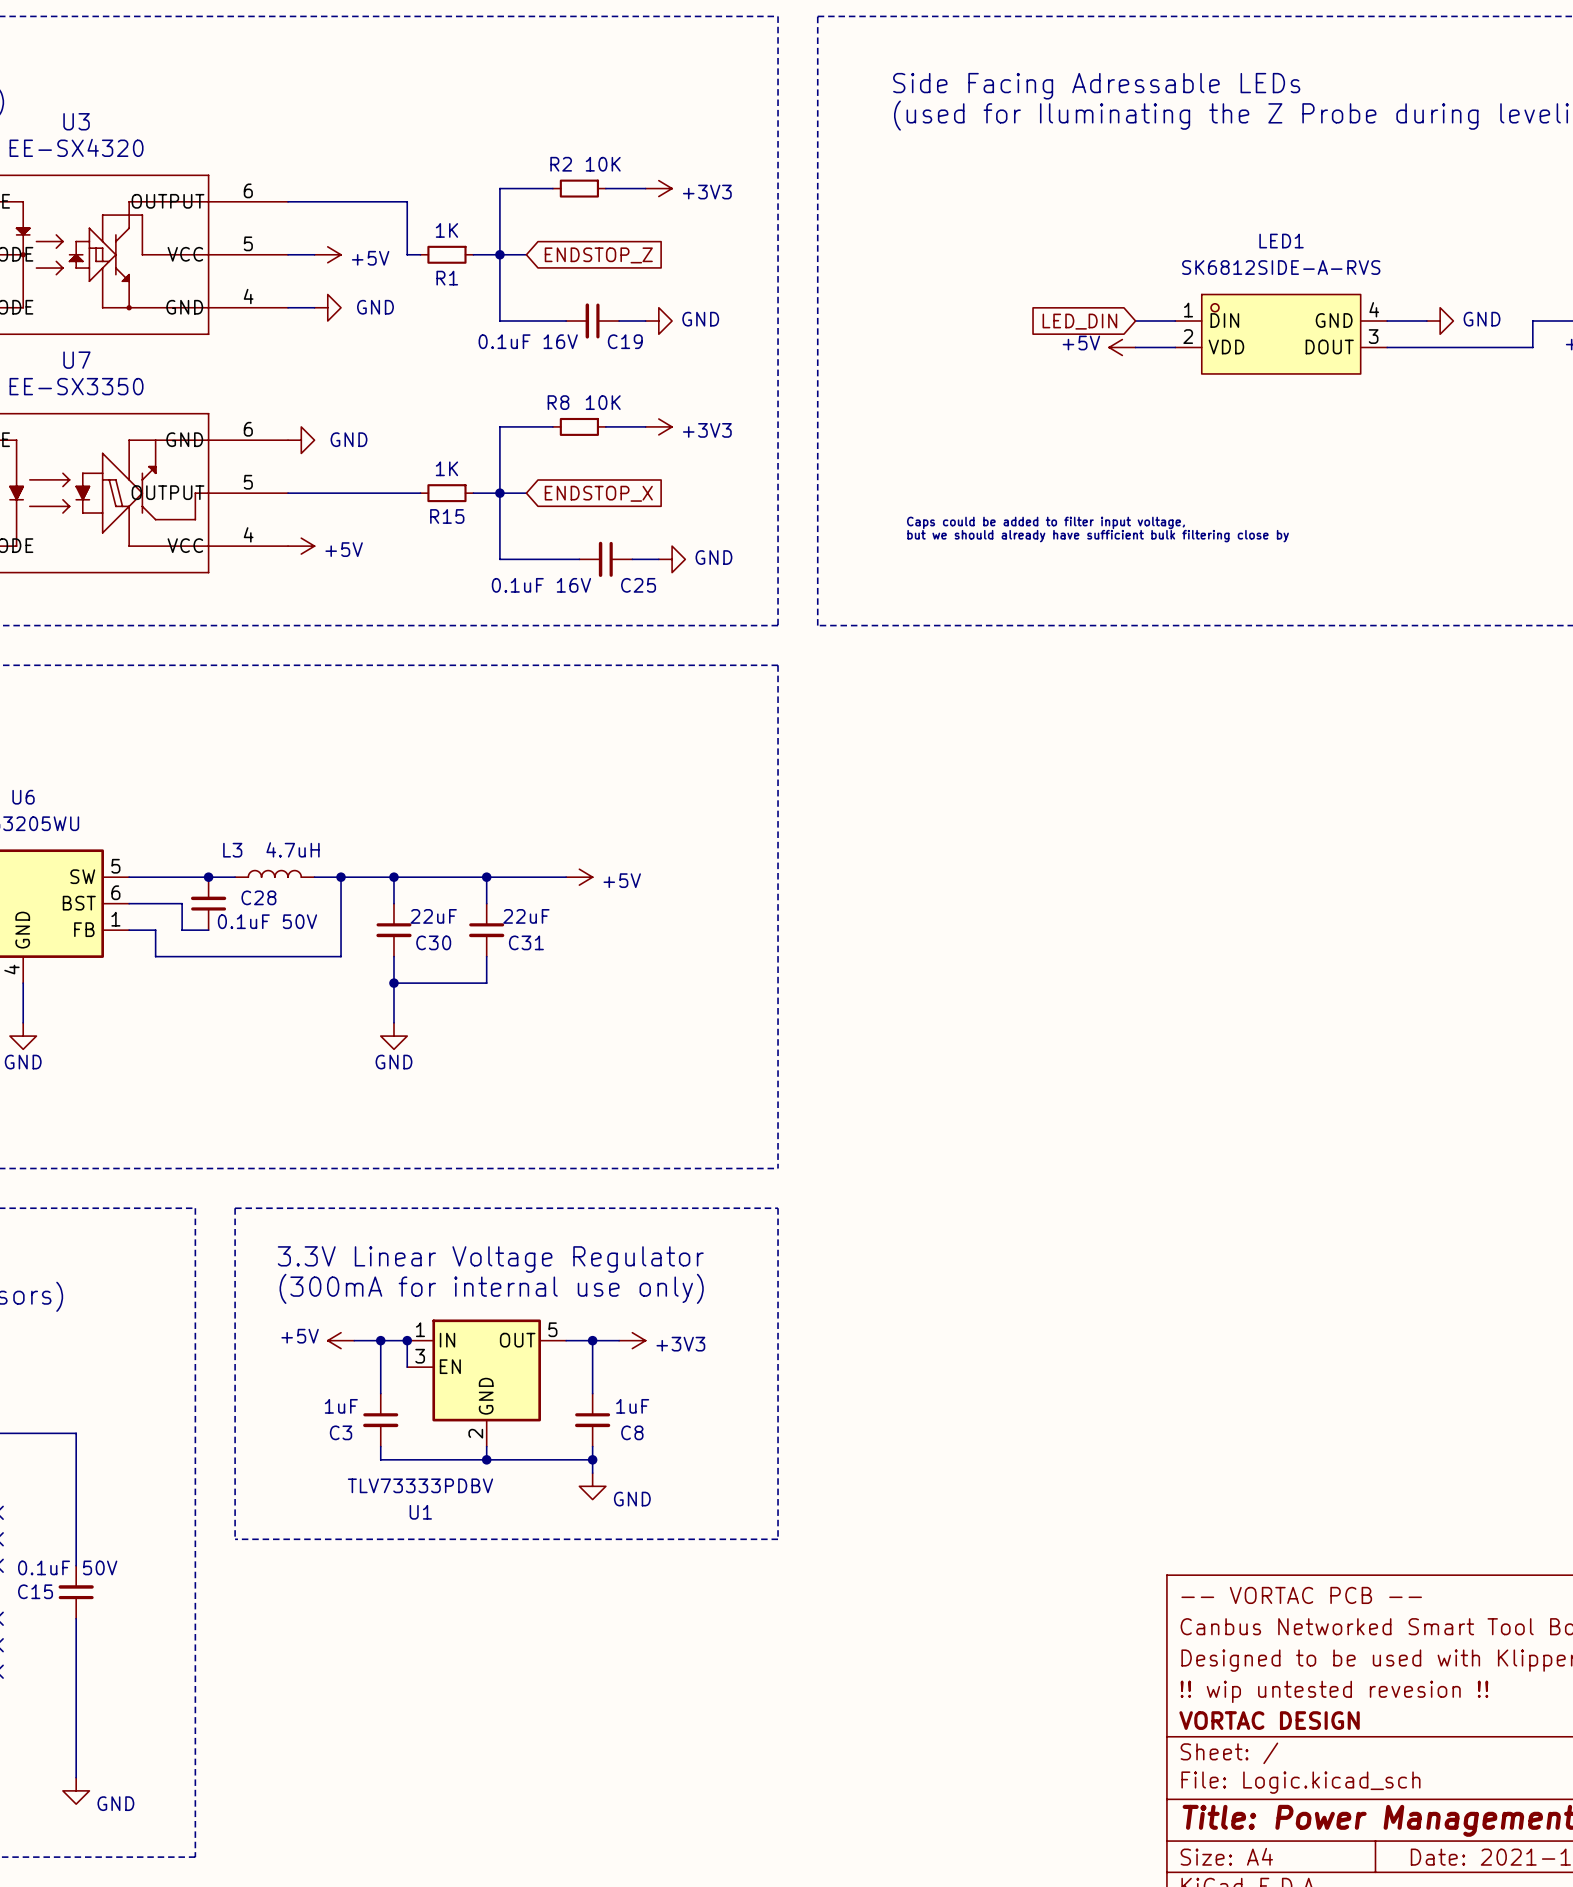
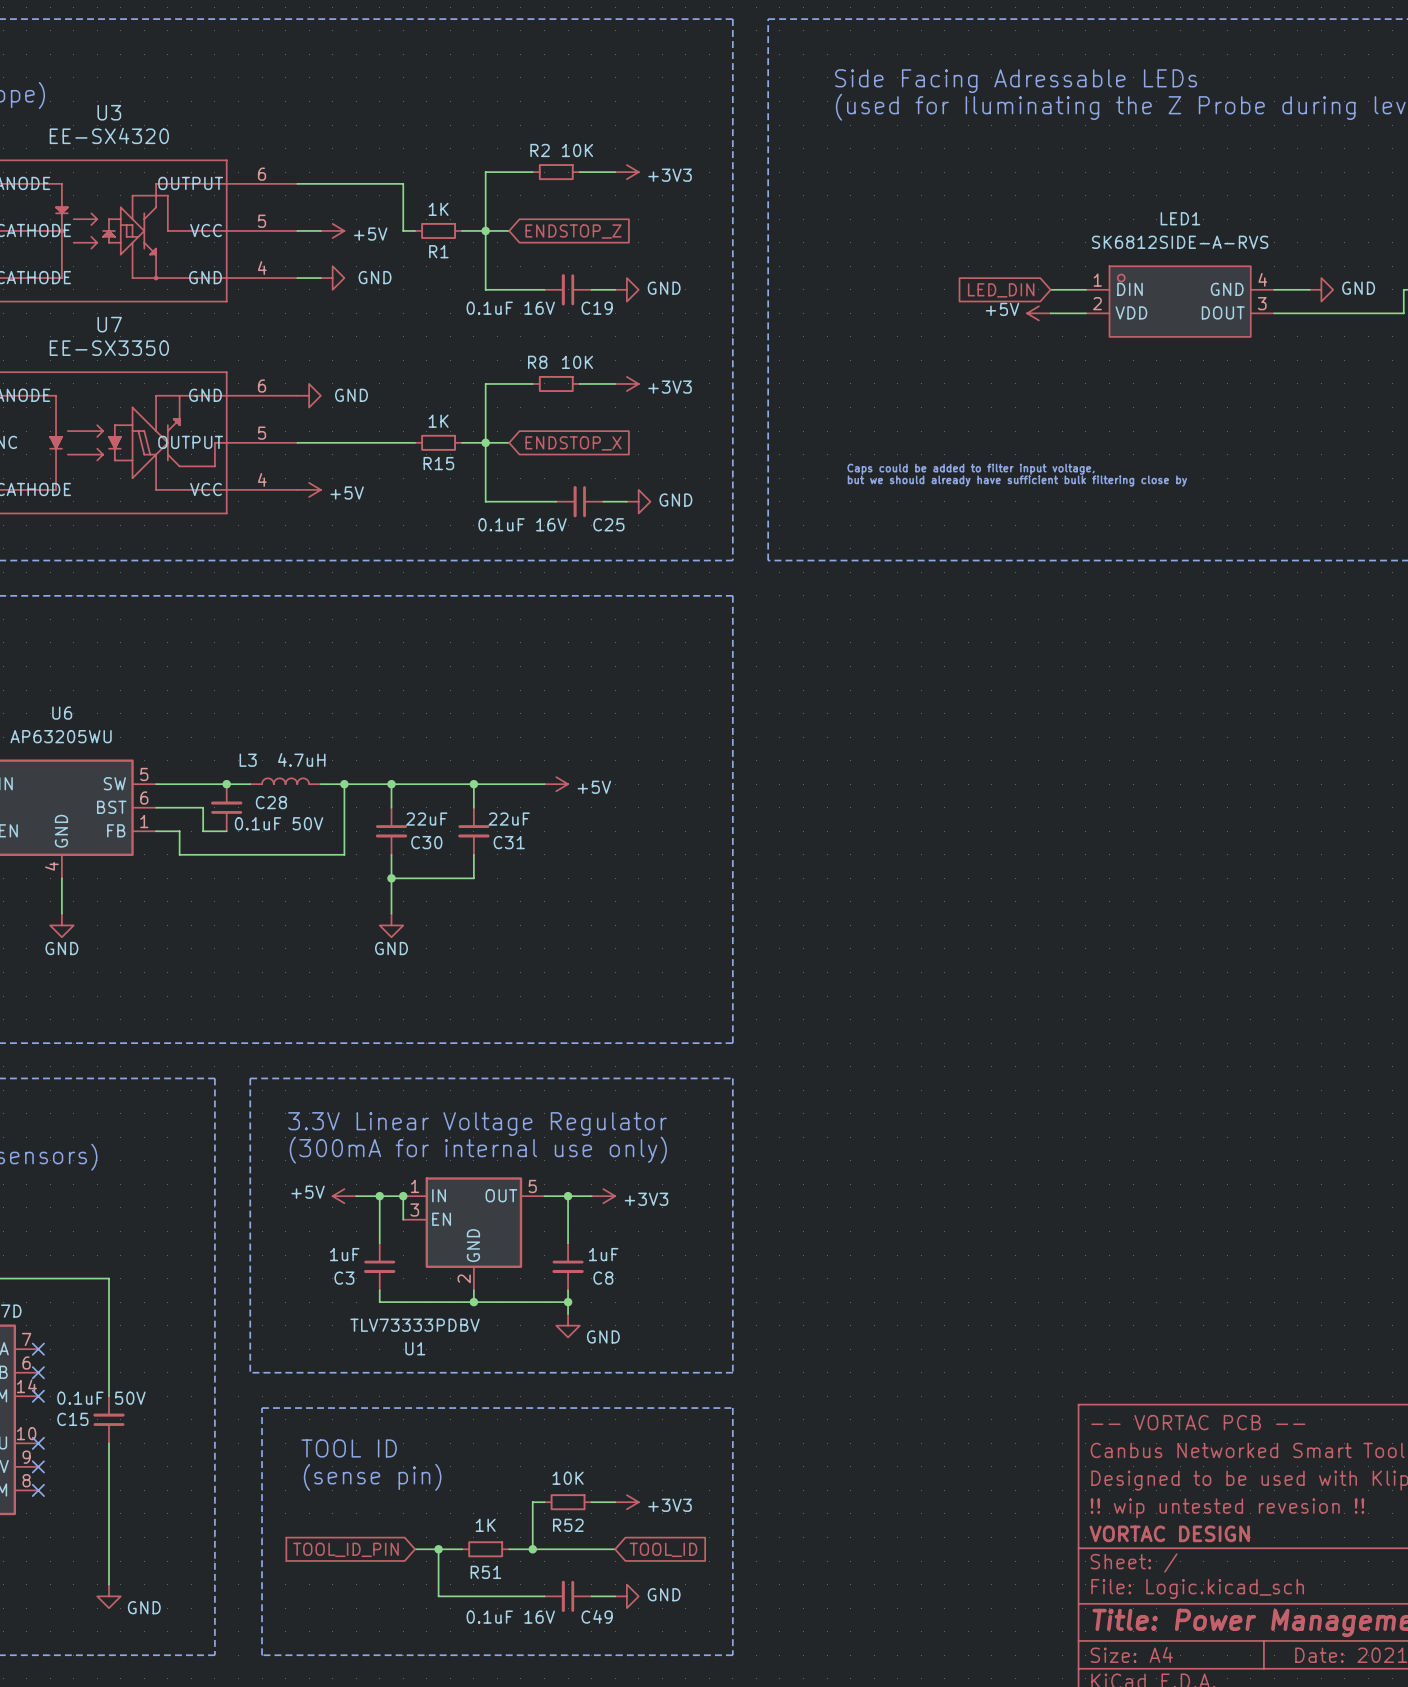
line: none -> (262, 1408) (732, 1408) (732, 1655) (262, 1655) (262, 1408)
text: none -> TOOL ID (349, 1448)
text: none -> (sense pin) (372, 1477)
wire: none -> (544, 1502) (532, 1502) (532, 1549)
R52: none -> 10K (568, 1502)
wire: none -> (591, 1502) (615, 1502)
power symbol: none -> +3V3 (626, 1502)
wire: none -> (415, 1549) (462, 1549)
wire: none -> (438, 1549) (438, 1596) (544, 1596)
junction: none -> (438, 1549)
R51: none -> 1K (485, 1549)
wire: none -> (509, 1549) (615, 1549)
junction: none -> (532, 1549)
global label: none -> TOOL_ID_PIN (345, 1549)
global label: none -> TOOL_ID (663, 1549)
C49: none -> 0.1uF 16V (568, 1596)
wire: none -> (591, 1596) (615, 1596)
power symbol: none -> GND (626, 1596)

